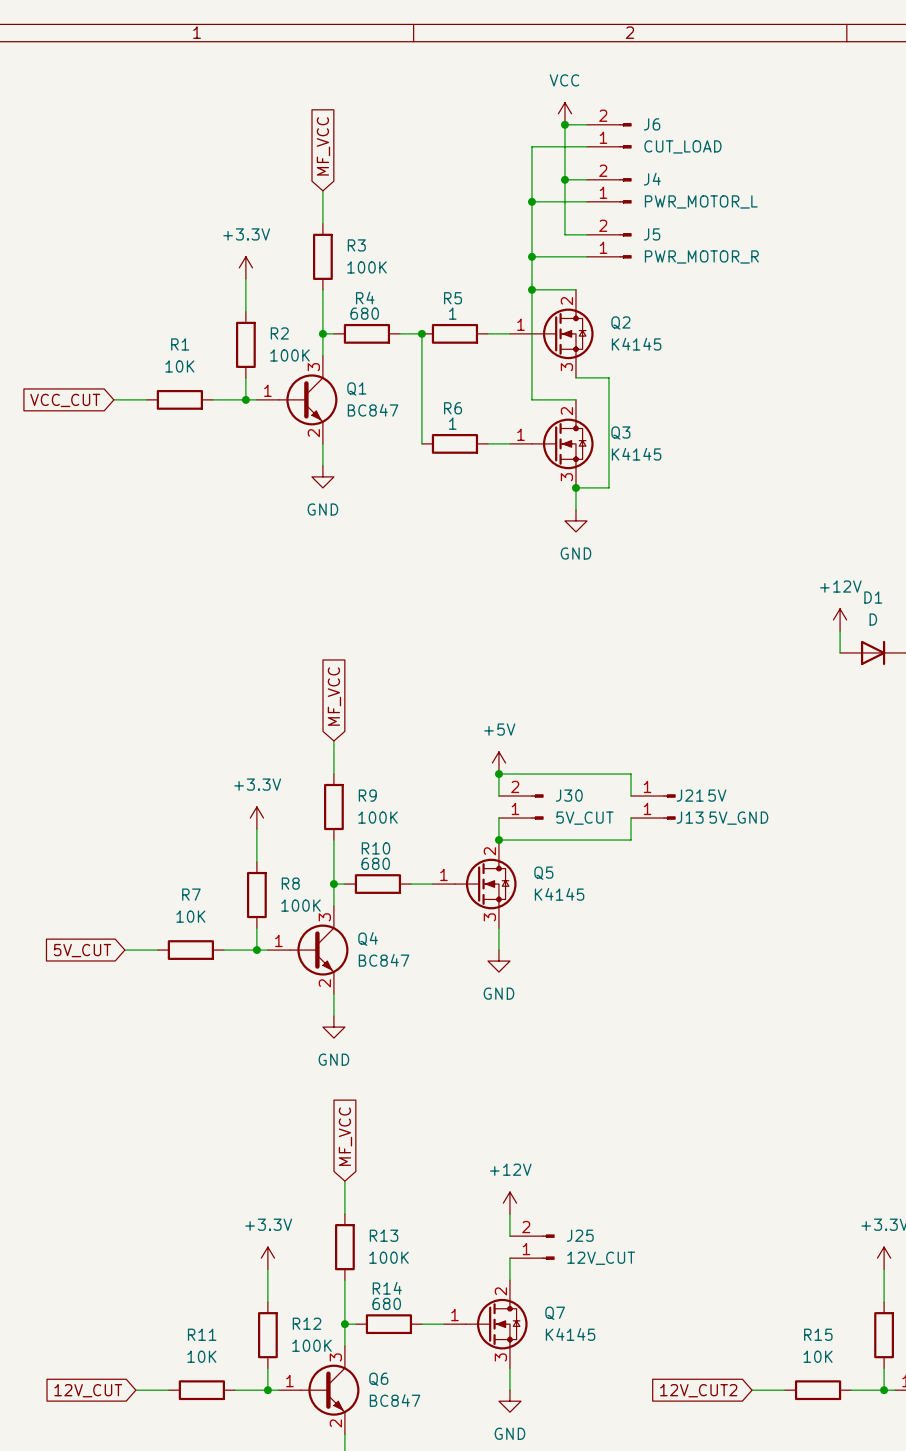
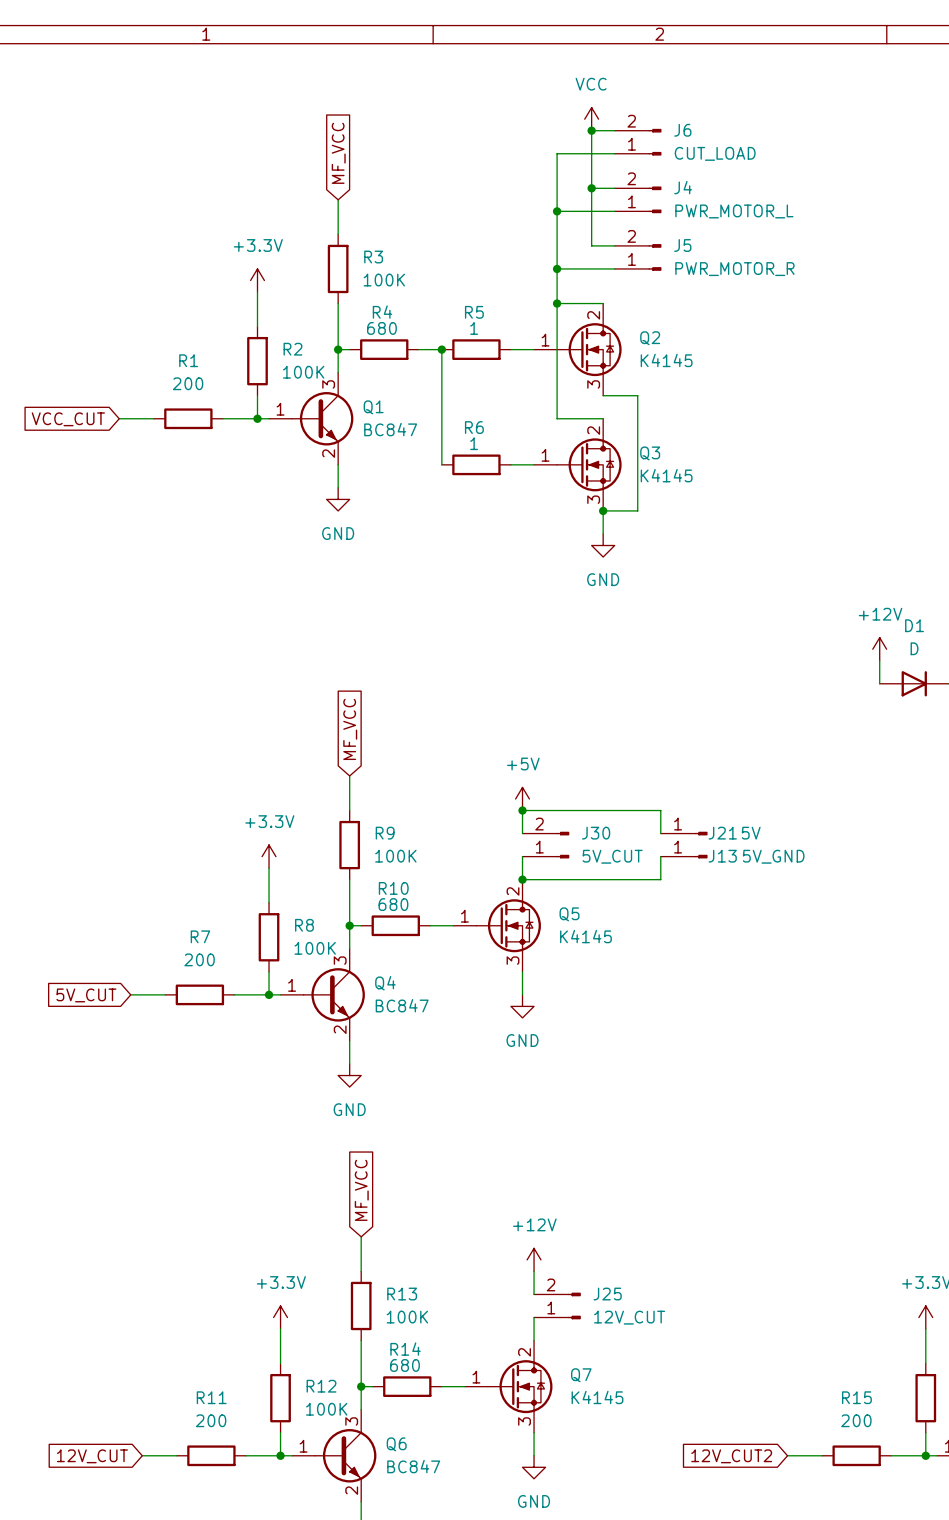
R1 value: 10K (179, 366) -> 200 (188, 383)
R7 value: 10K (190, 916) -> 200 (199, 959)
R11 value: 10K (201, 1356) -> 200 (211, 1420)
R15 value: 10K (818, 1356) -> 200 (856, 1420)

